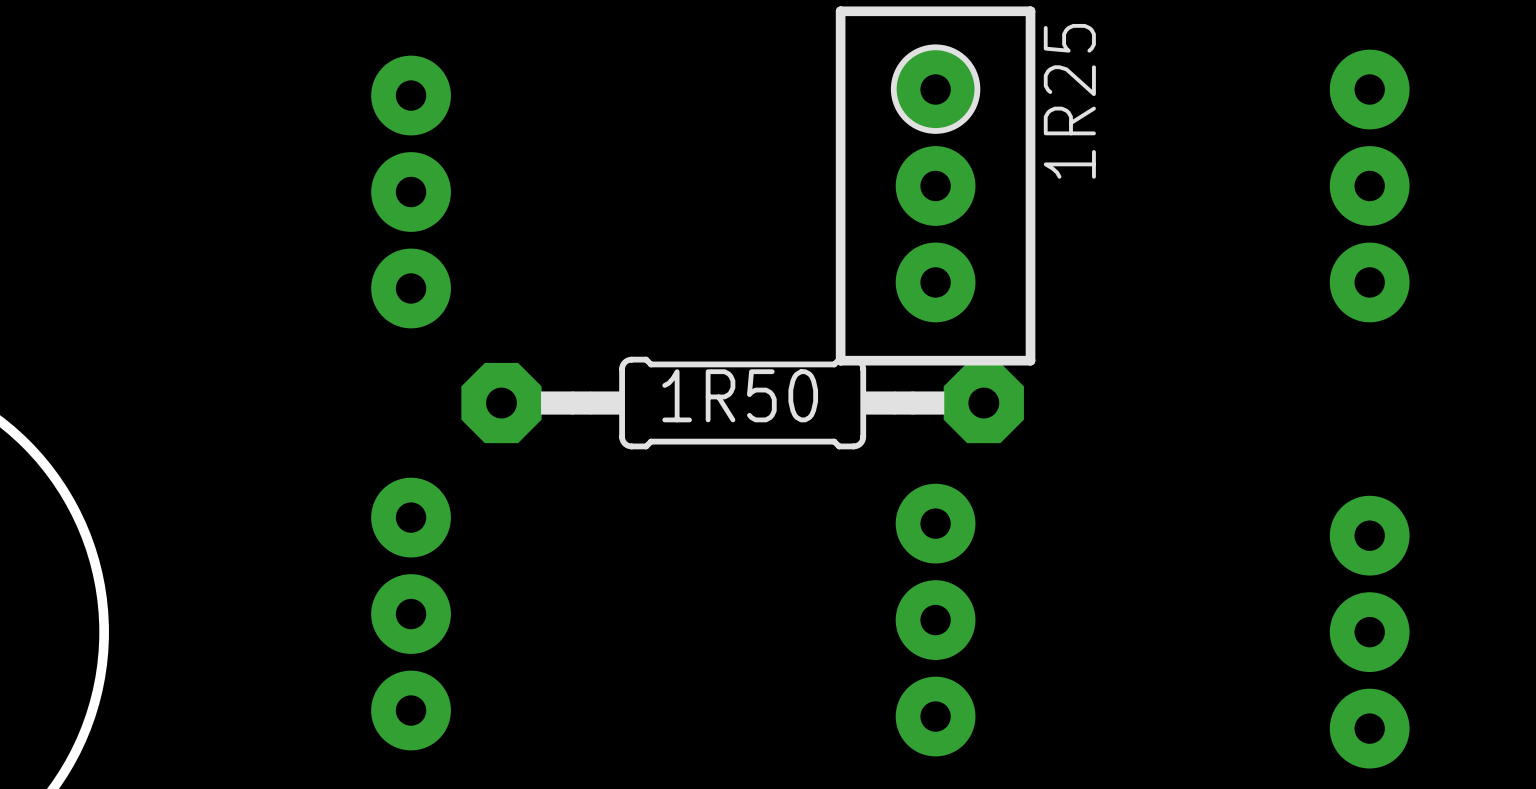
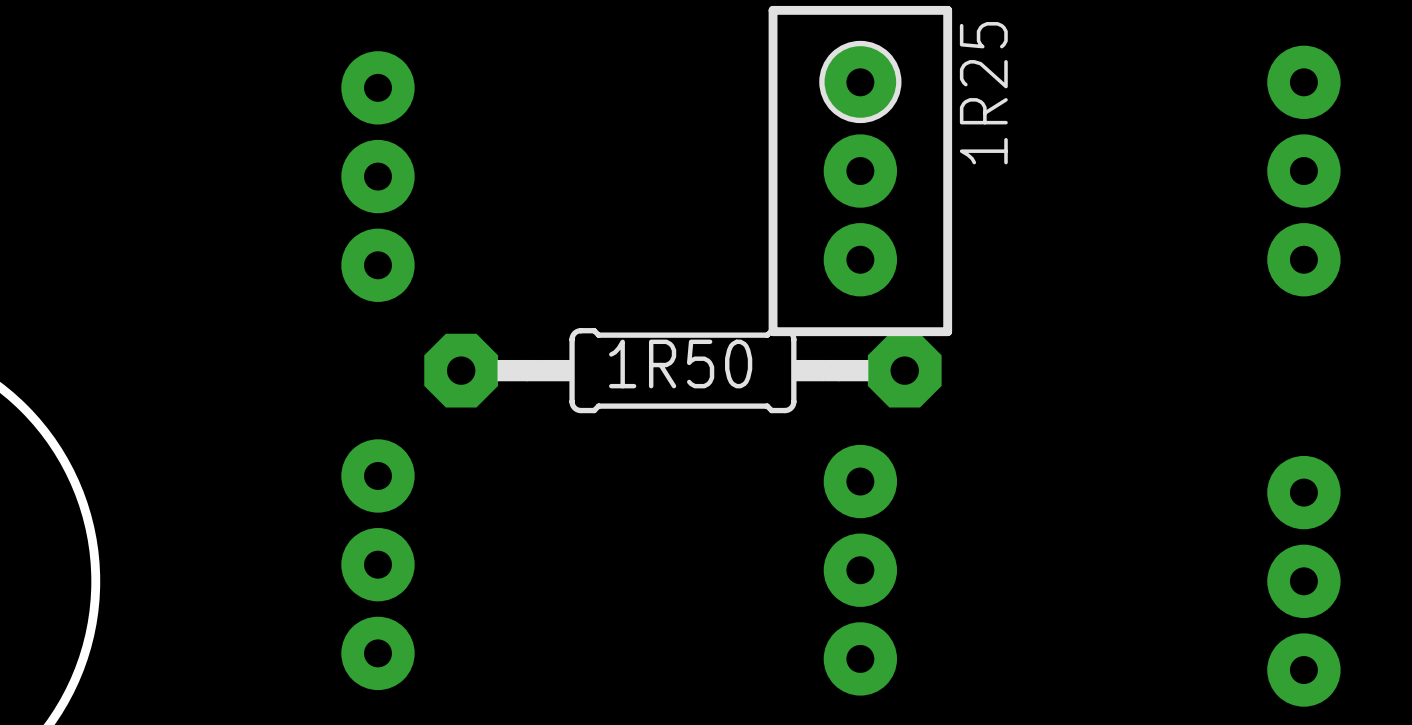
part position: (1369, 185) -> (1303, 171)
part position: (1369, 632) -> (1303, 581)

